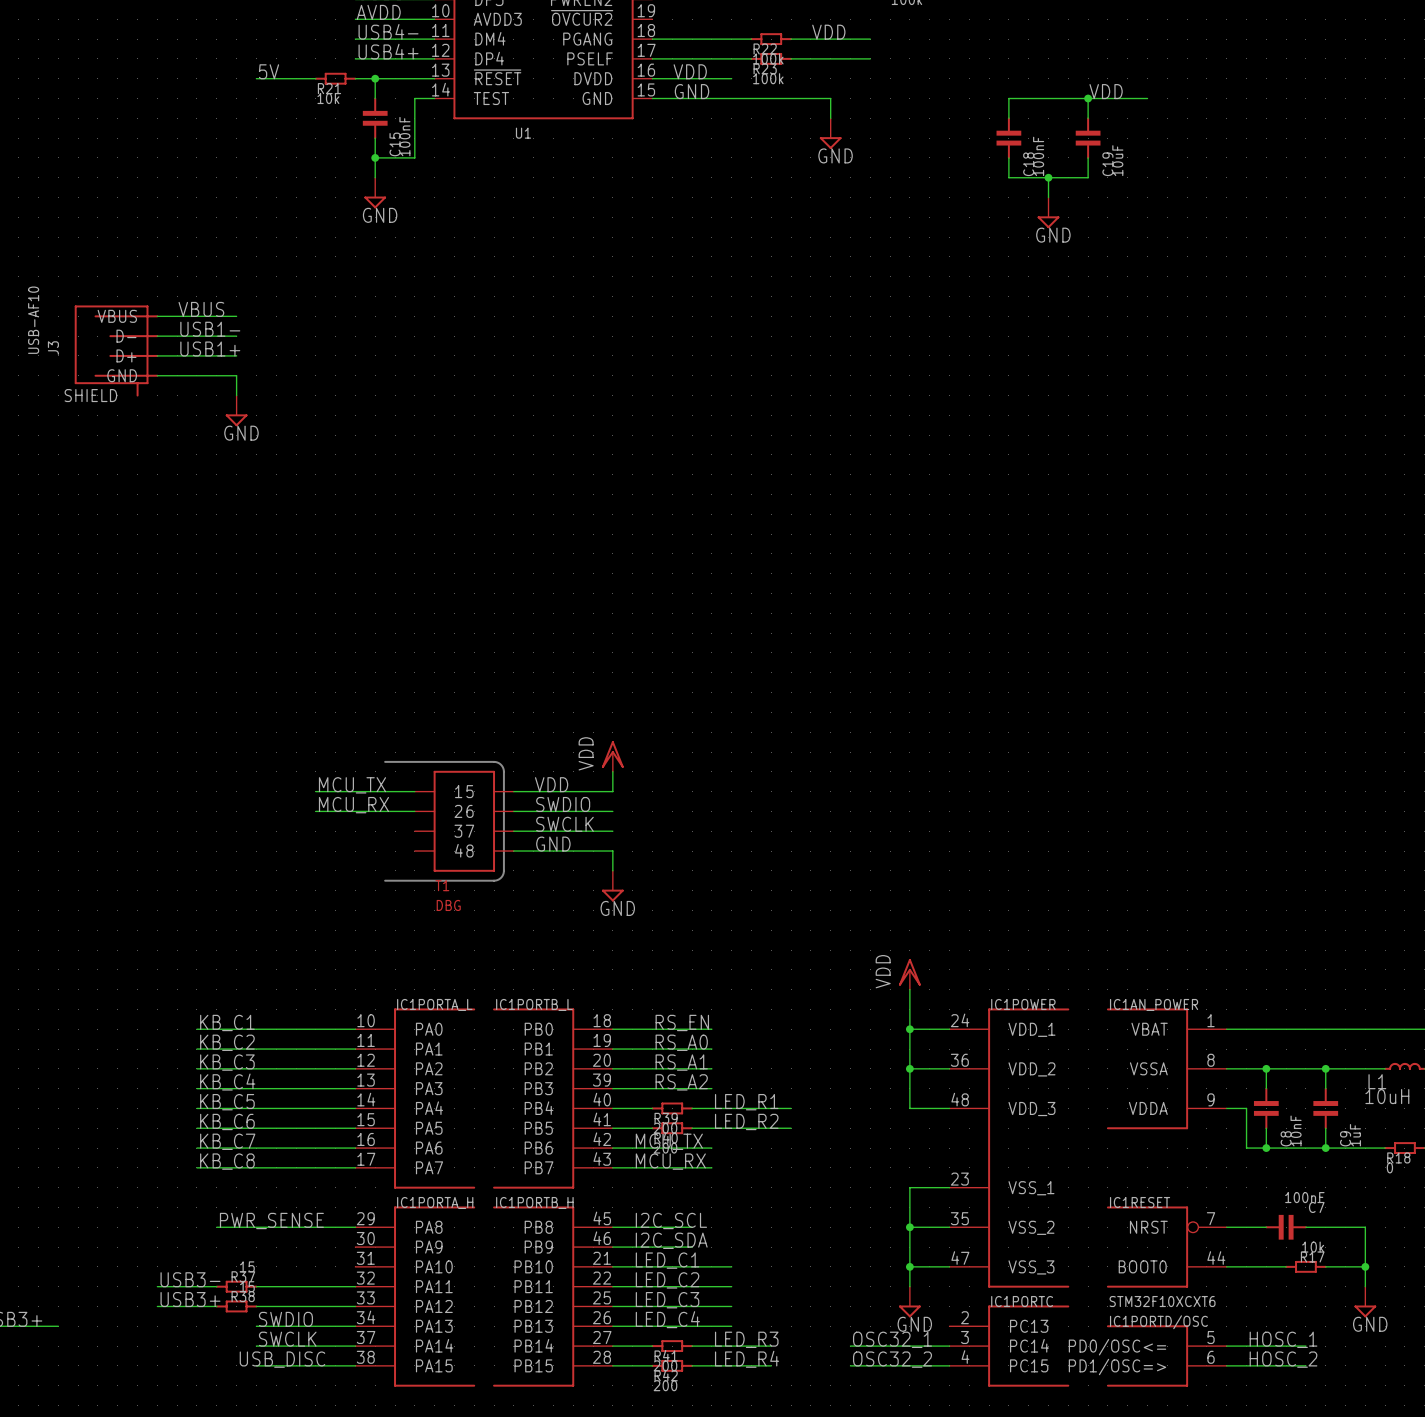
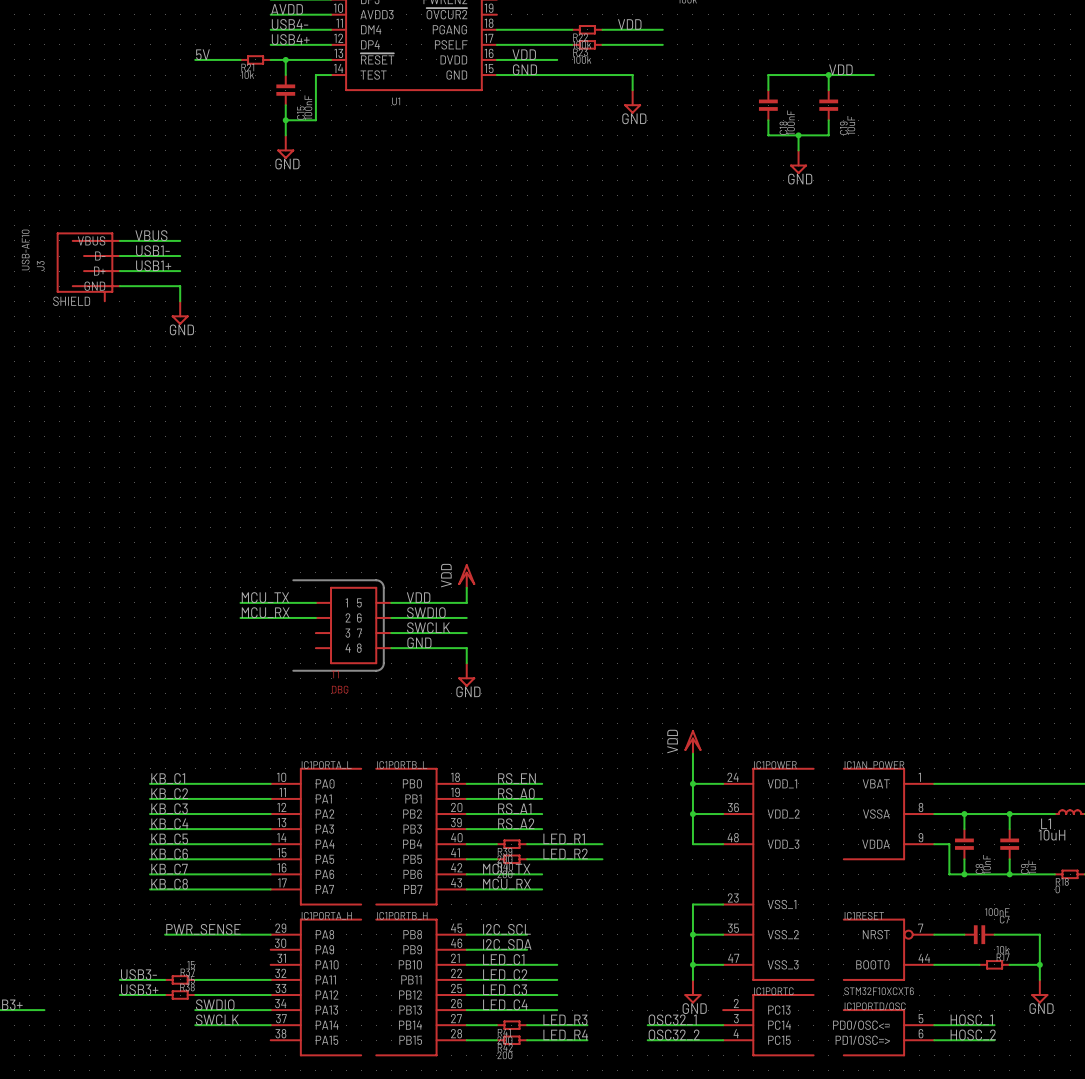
label: USB_DISC (282, 1359) -> none
wire: (256, 1365) (355, 1365) -> none

